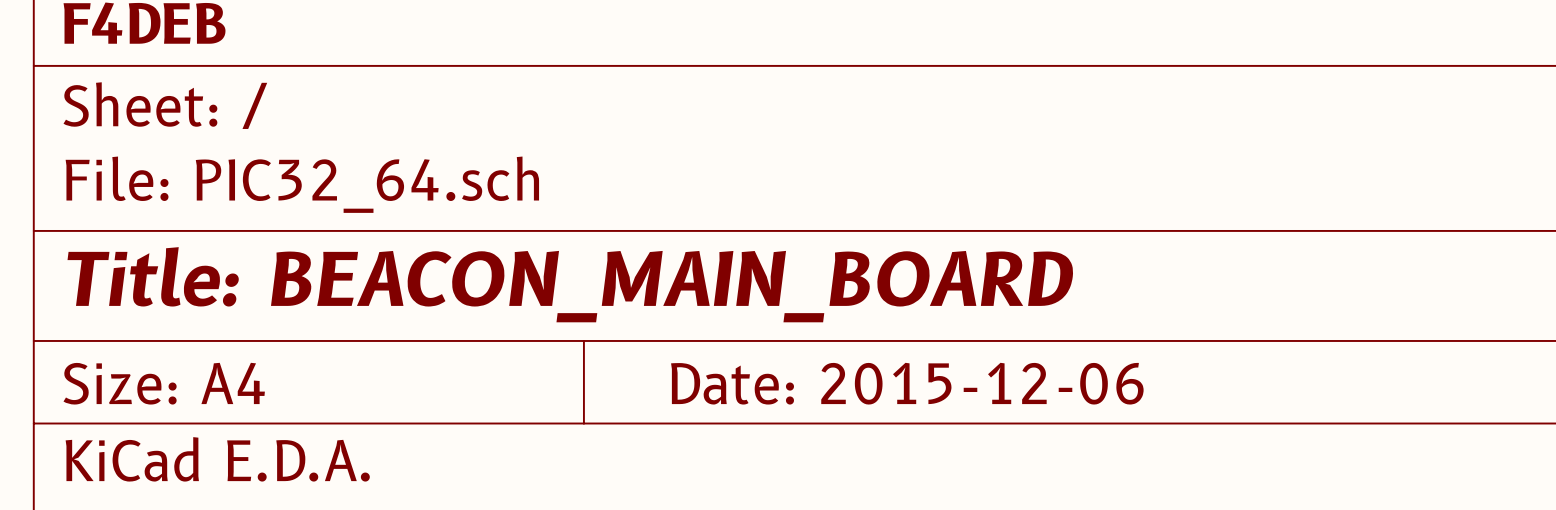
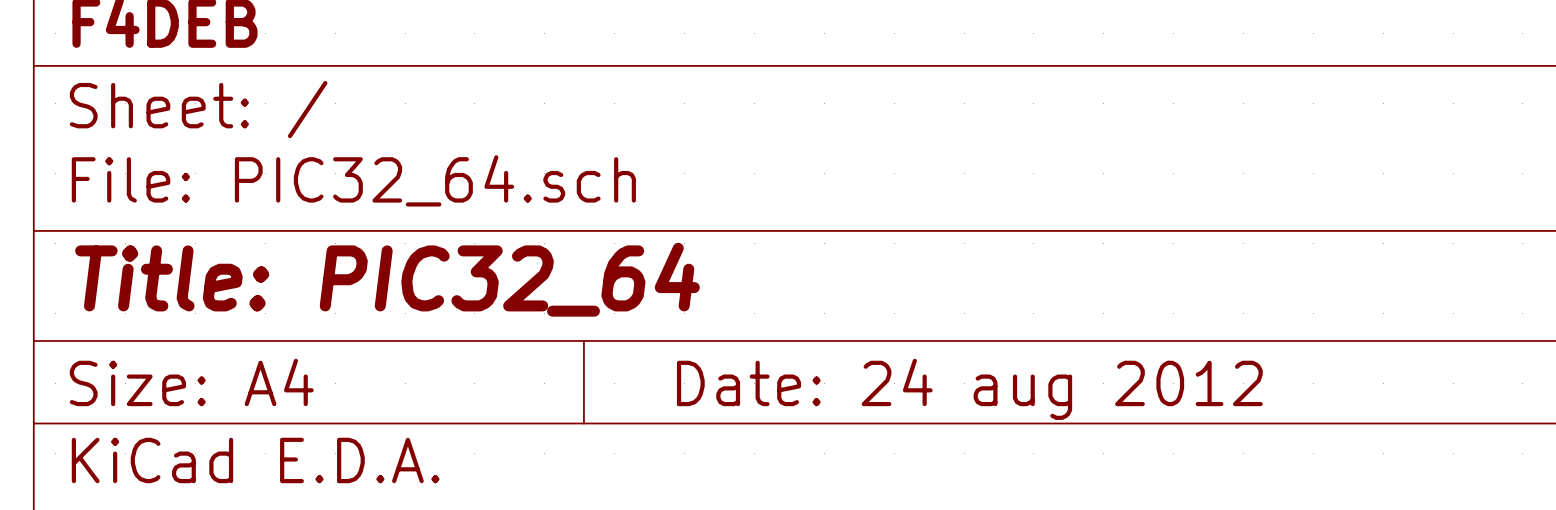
title block: Title: BEACON_MAIN_BOARD (570, 284) -> Title: PIC32_64 (387, 279)
title block: Date: 2015-12-06 (907, 383) -> Date: 24 aug 2012 (969, 389)

